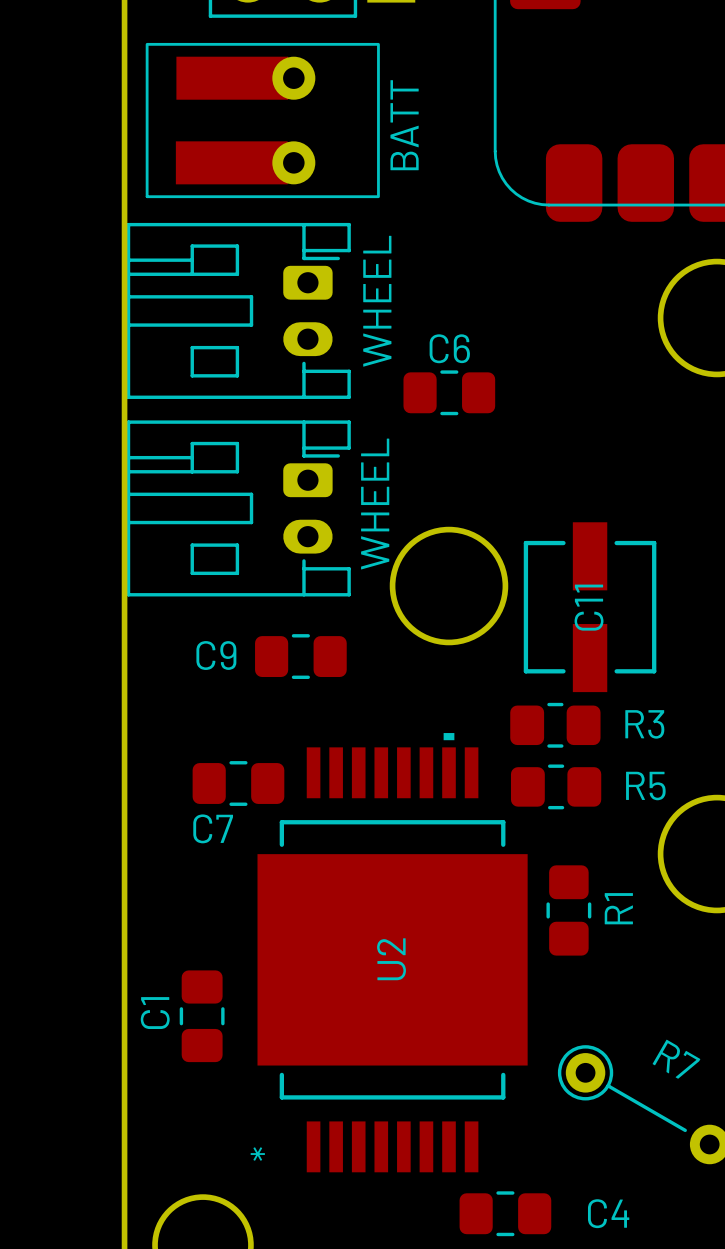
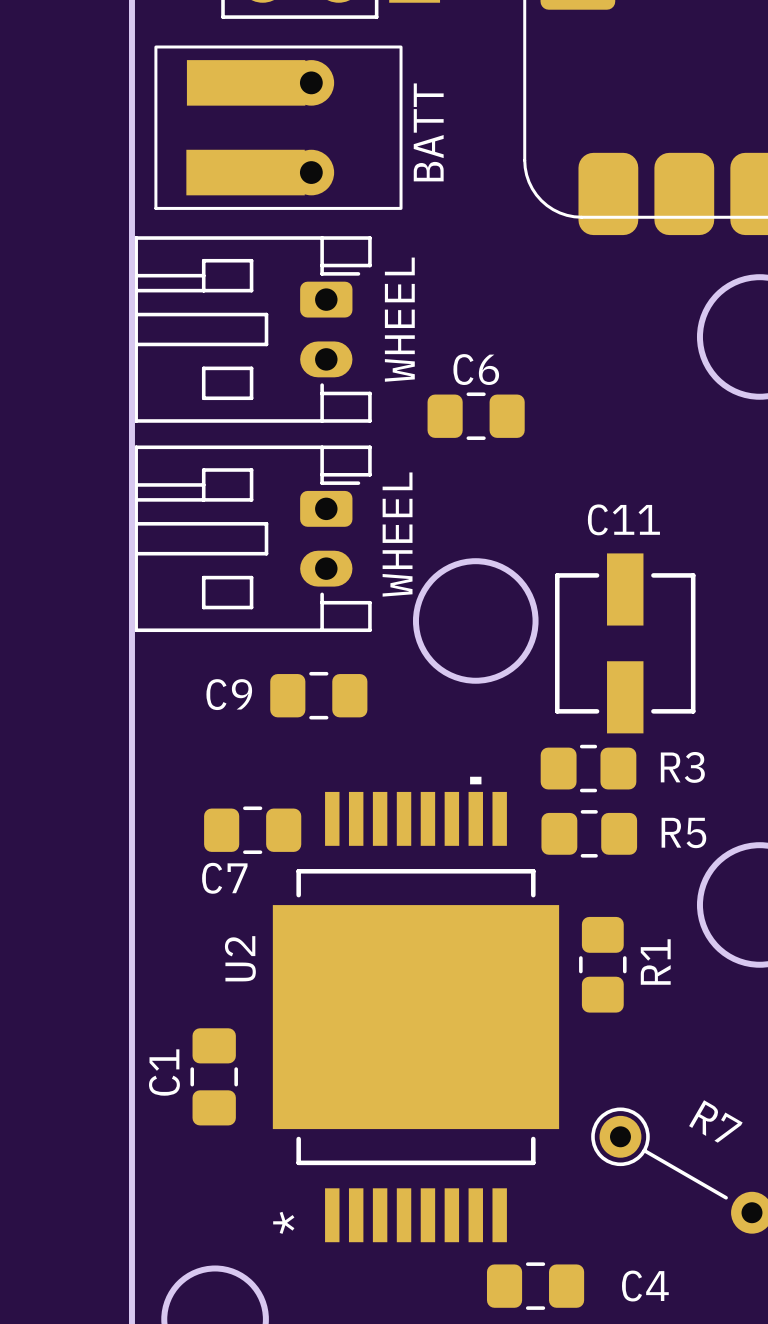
C11 name rotation: 0° (589, 607) -> 90° clockwise (623, 519)
C11 name position: C11 (589, 607) -> C11 (623, 519)
U2 name position: U2 (391, 959) -> U2 (240, 958)

